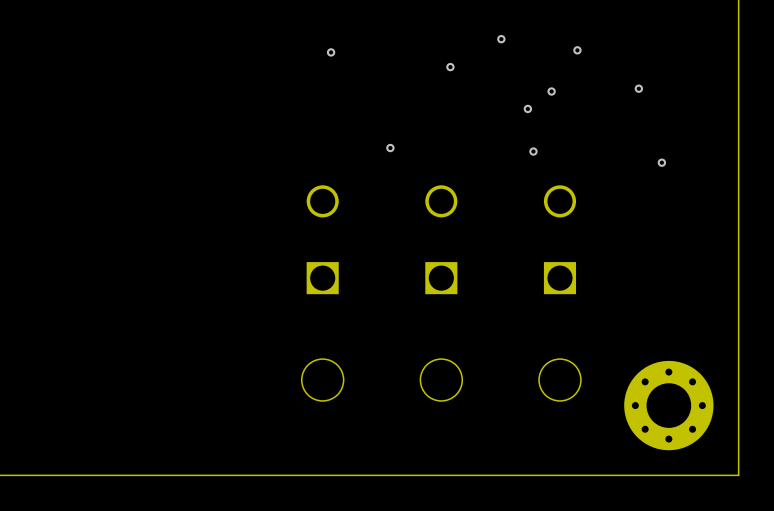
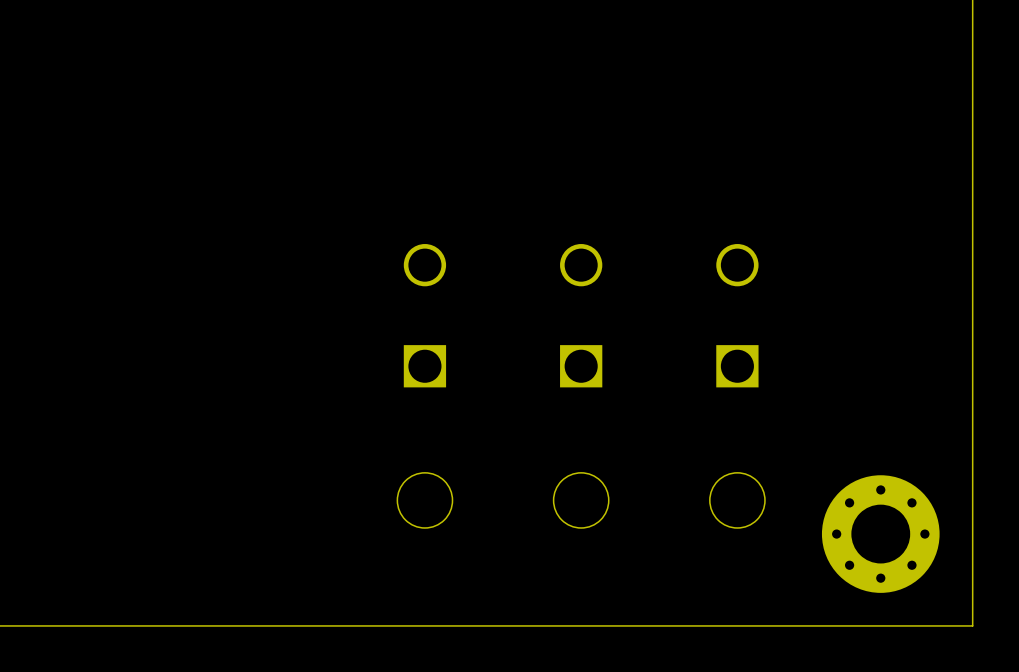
via: (501, 39) -> none
via: (577, 50) -> none
via: (331, 52) -> none
via: (450, 67) -> none
via: (638, 88) -> none
via: (551, 91) -> none
via: (527, 108) -> none
via: (390, 148) -> none
via: (533, 151) -> none
via: (661, 162) -> none

